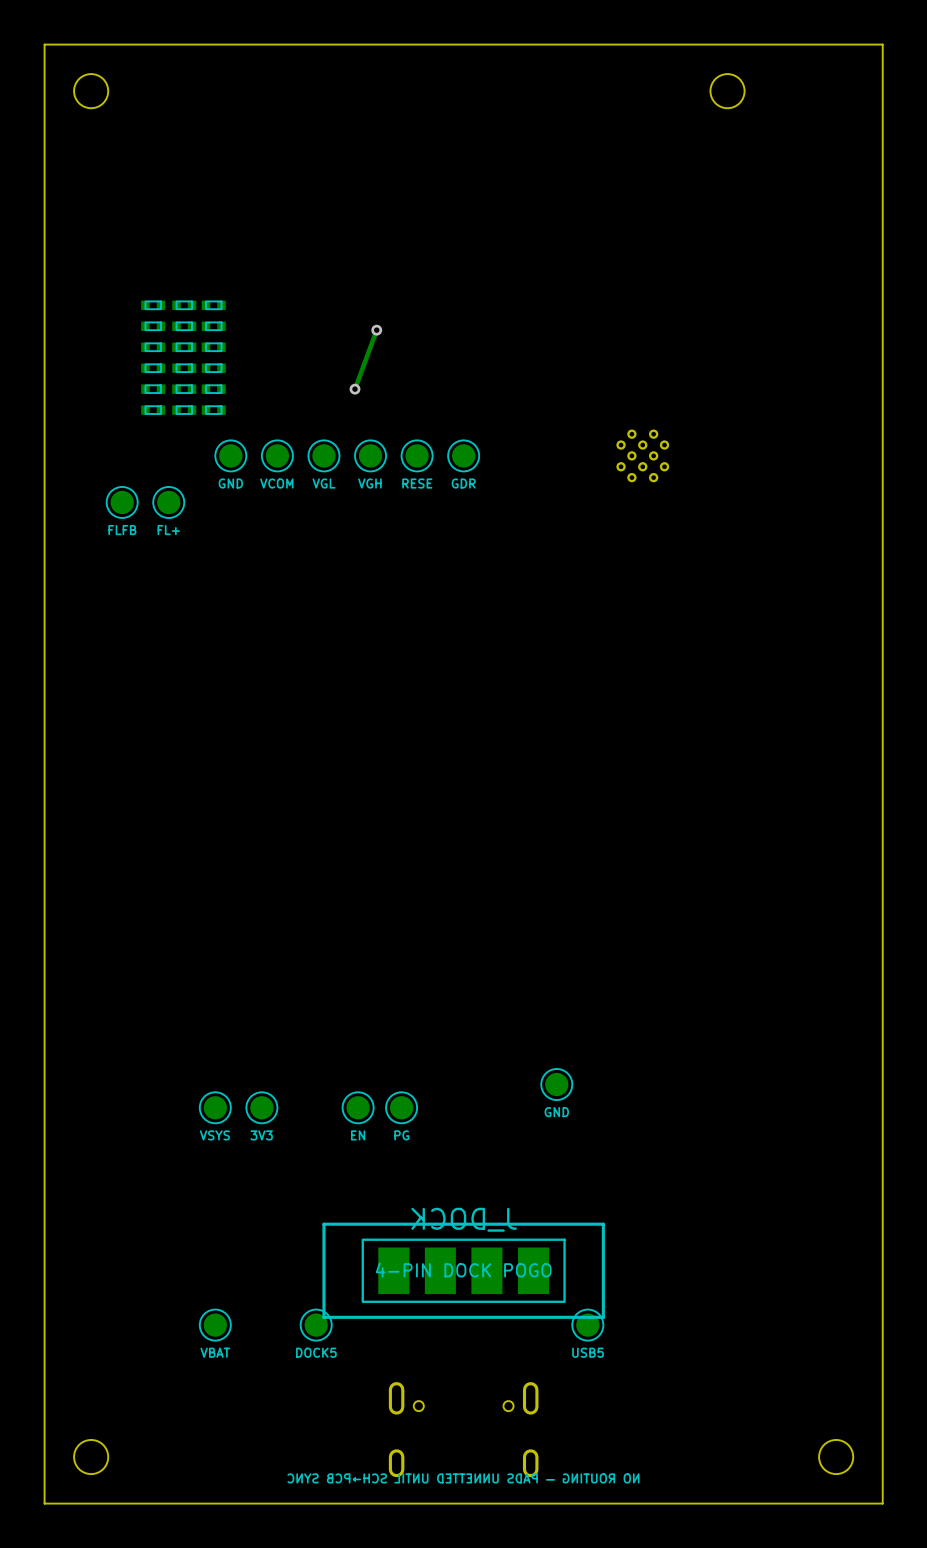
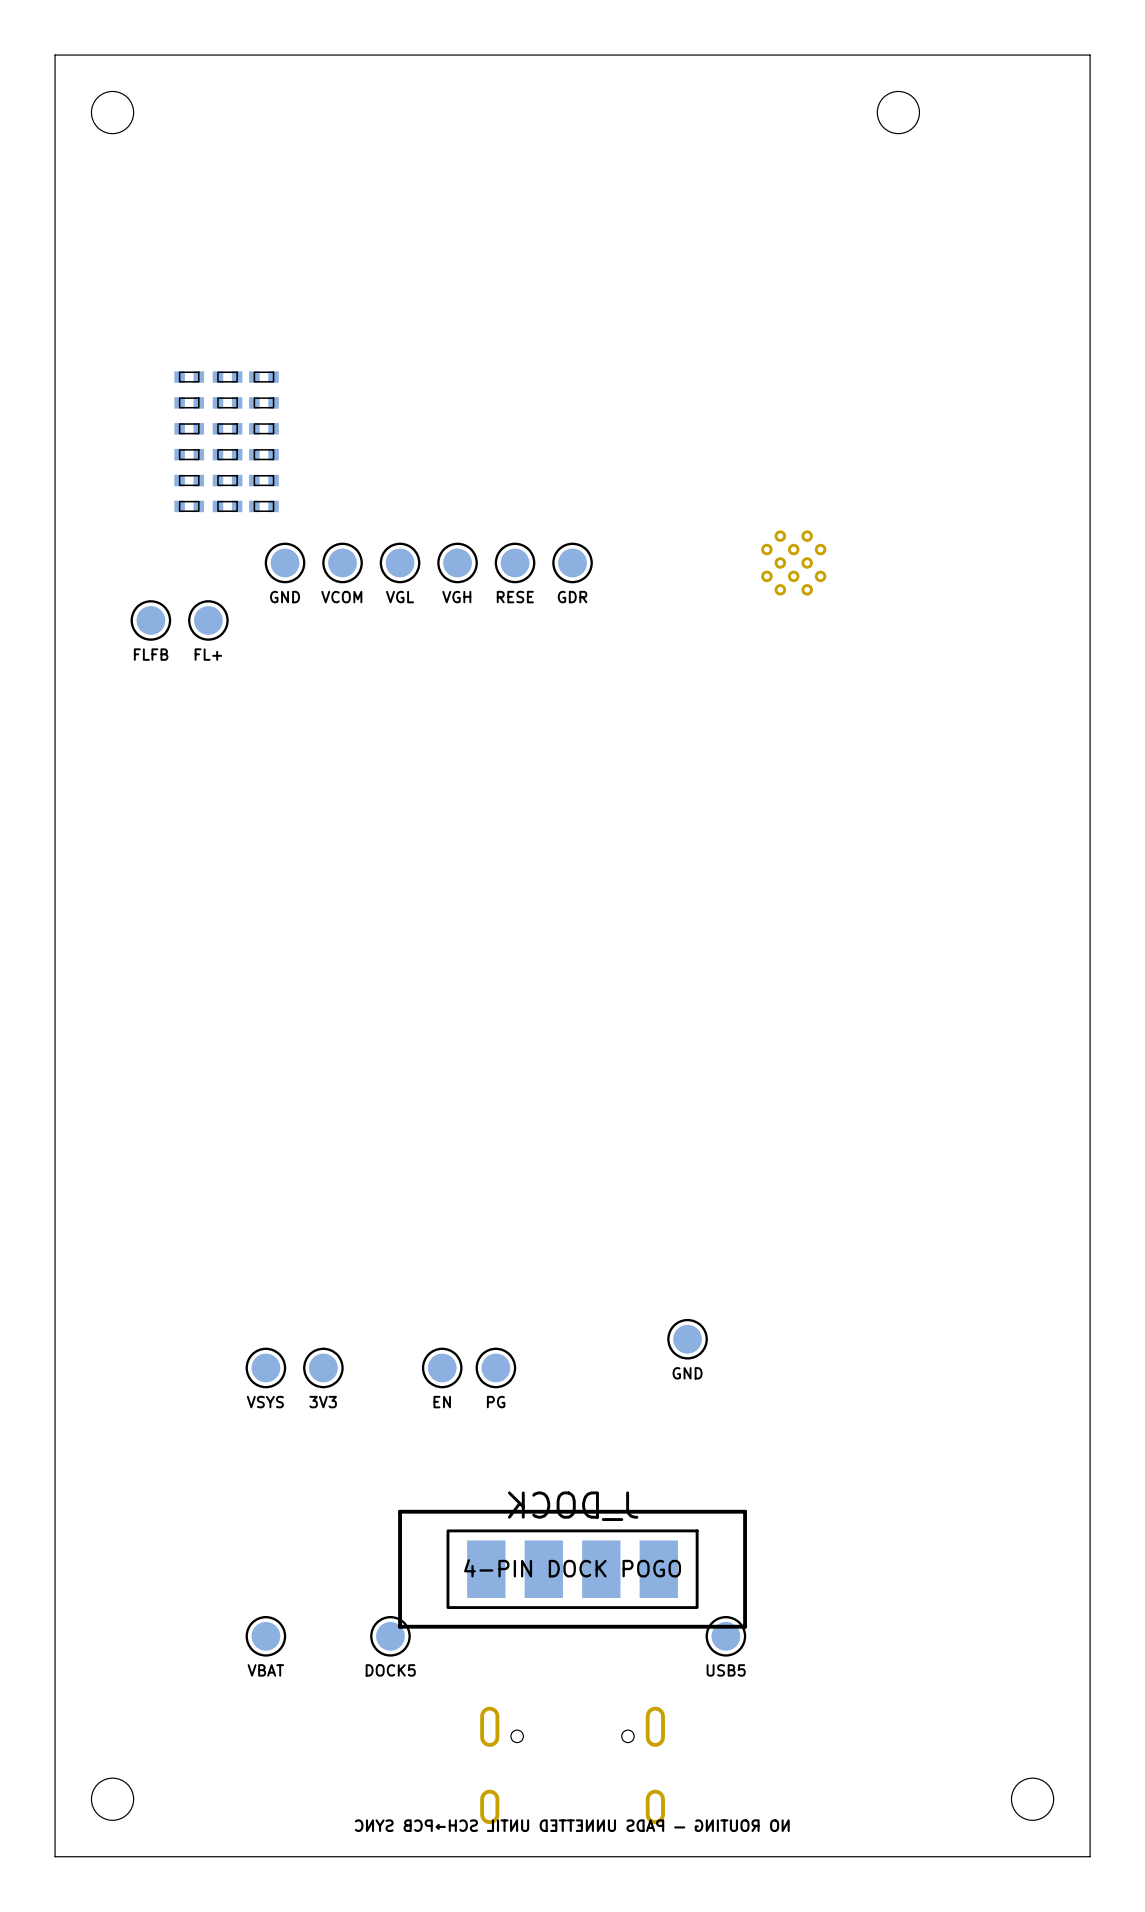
track: (376, 330) (355, 389) -> none
via: (376, 330) -> none
via: (355, 389) -> none

